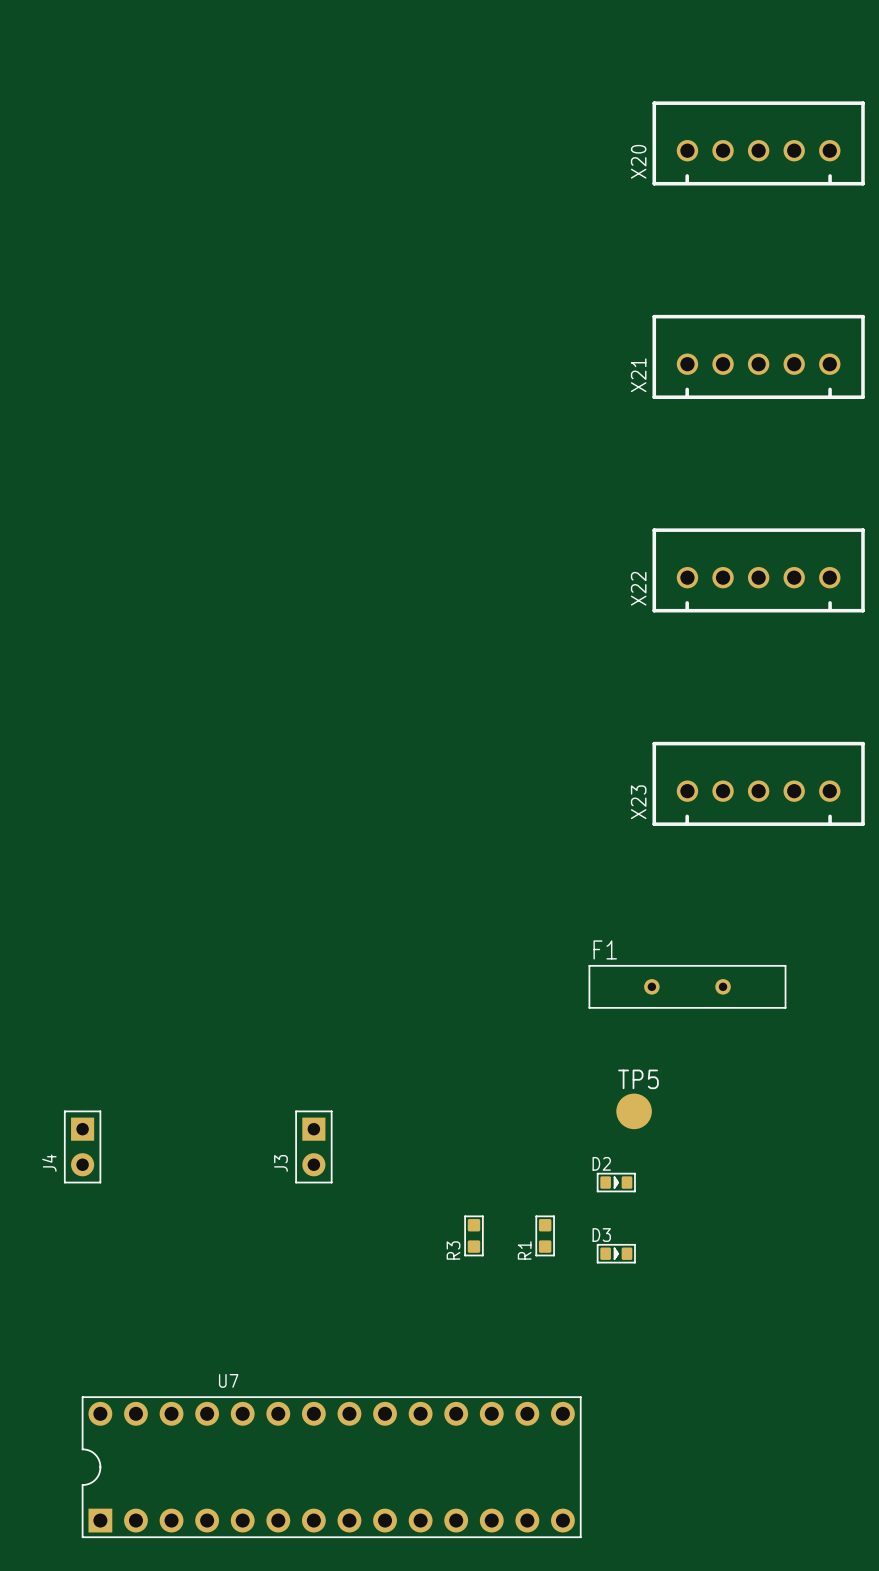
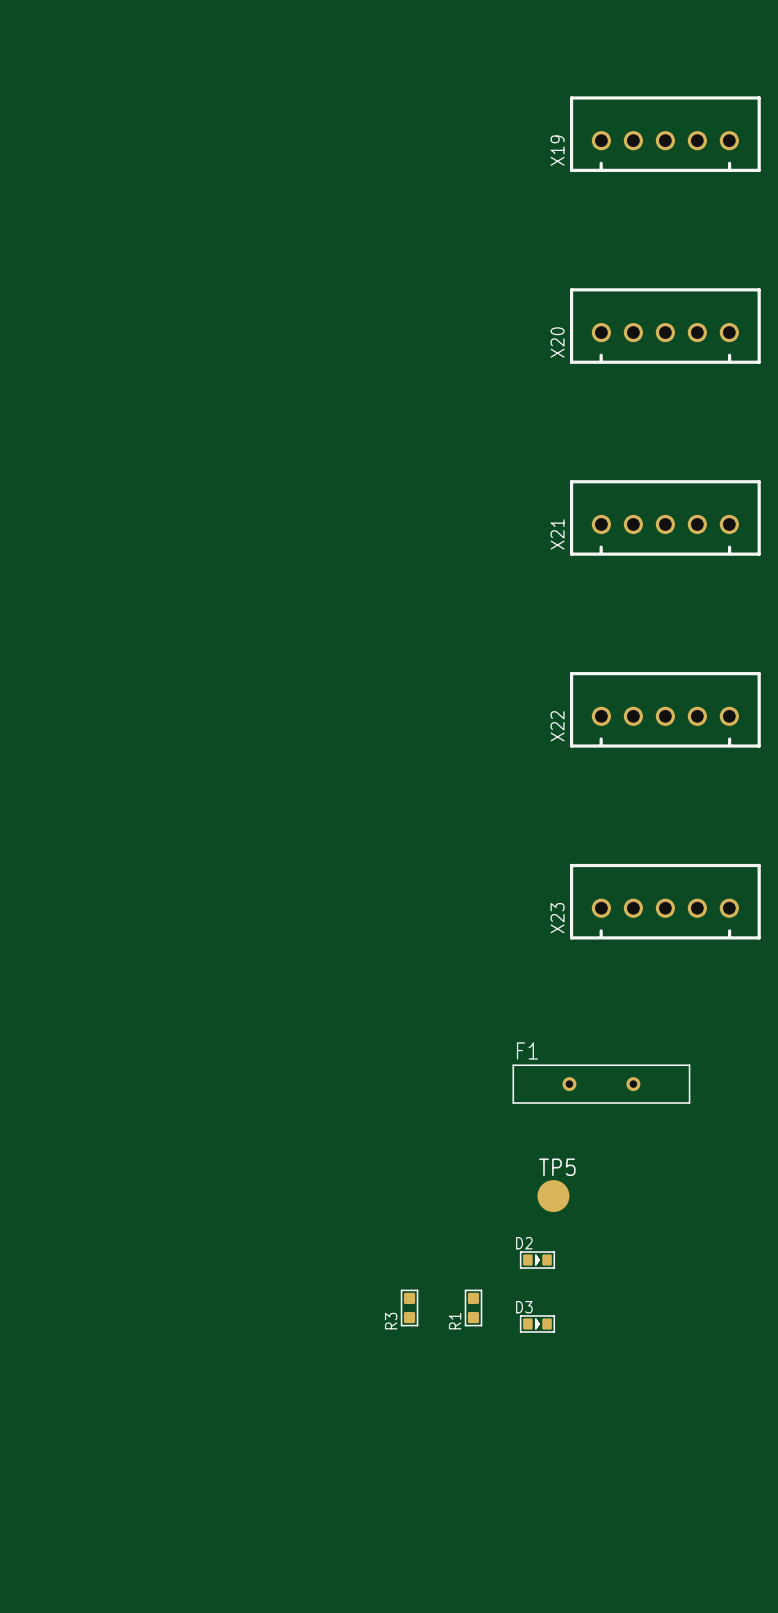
J4: (82, 1146) -> none
J3: (313, 1146) -> none
U7: (331, 1467) -> none

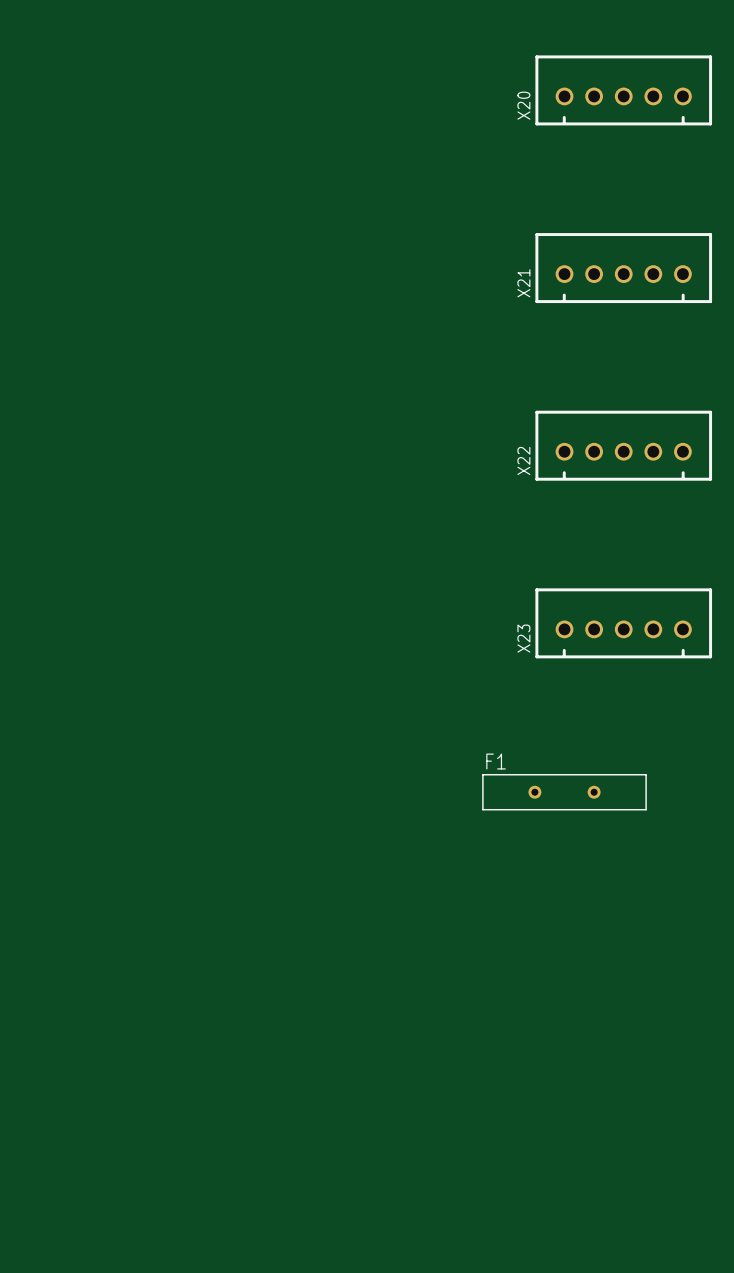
TP5: (553, 1196) -> none
D2: (537, 1260) -> none
R3: (409, 1307) -> none
R1: (473, 1307) -> none
D3: (537, 1323) -> none

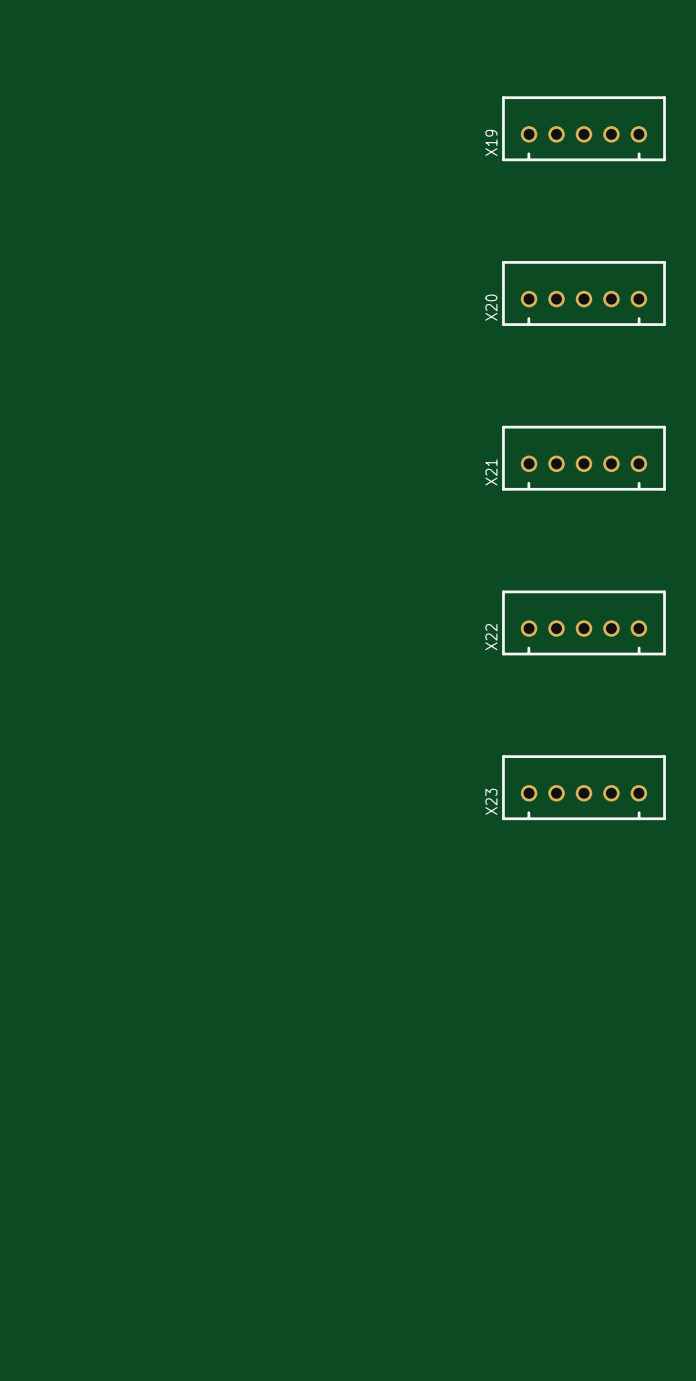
F1: (564, 792) -> none

